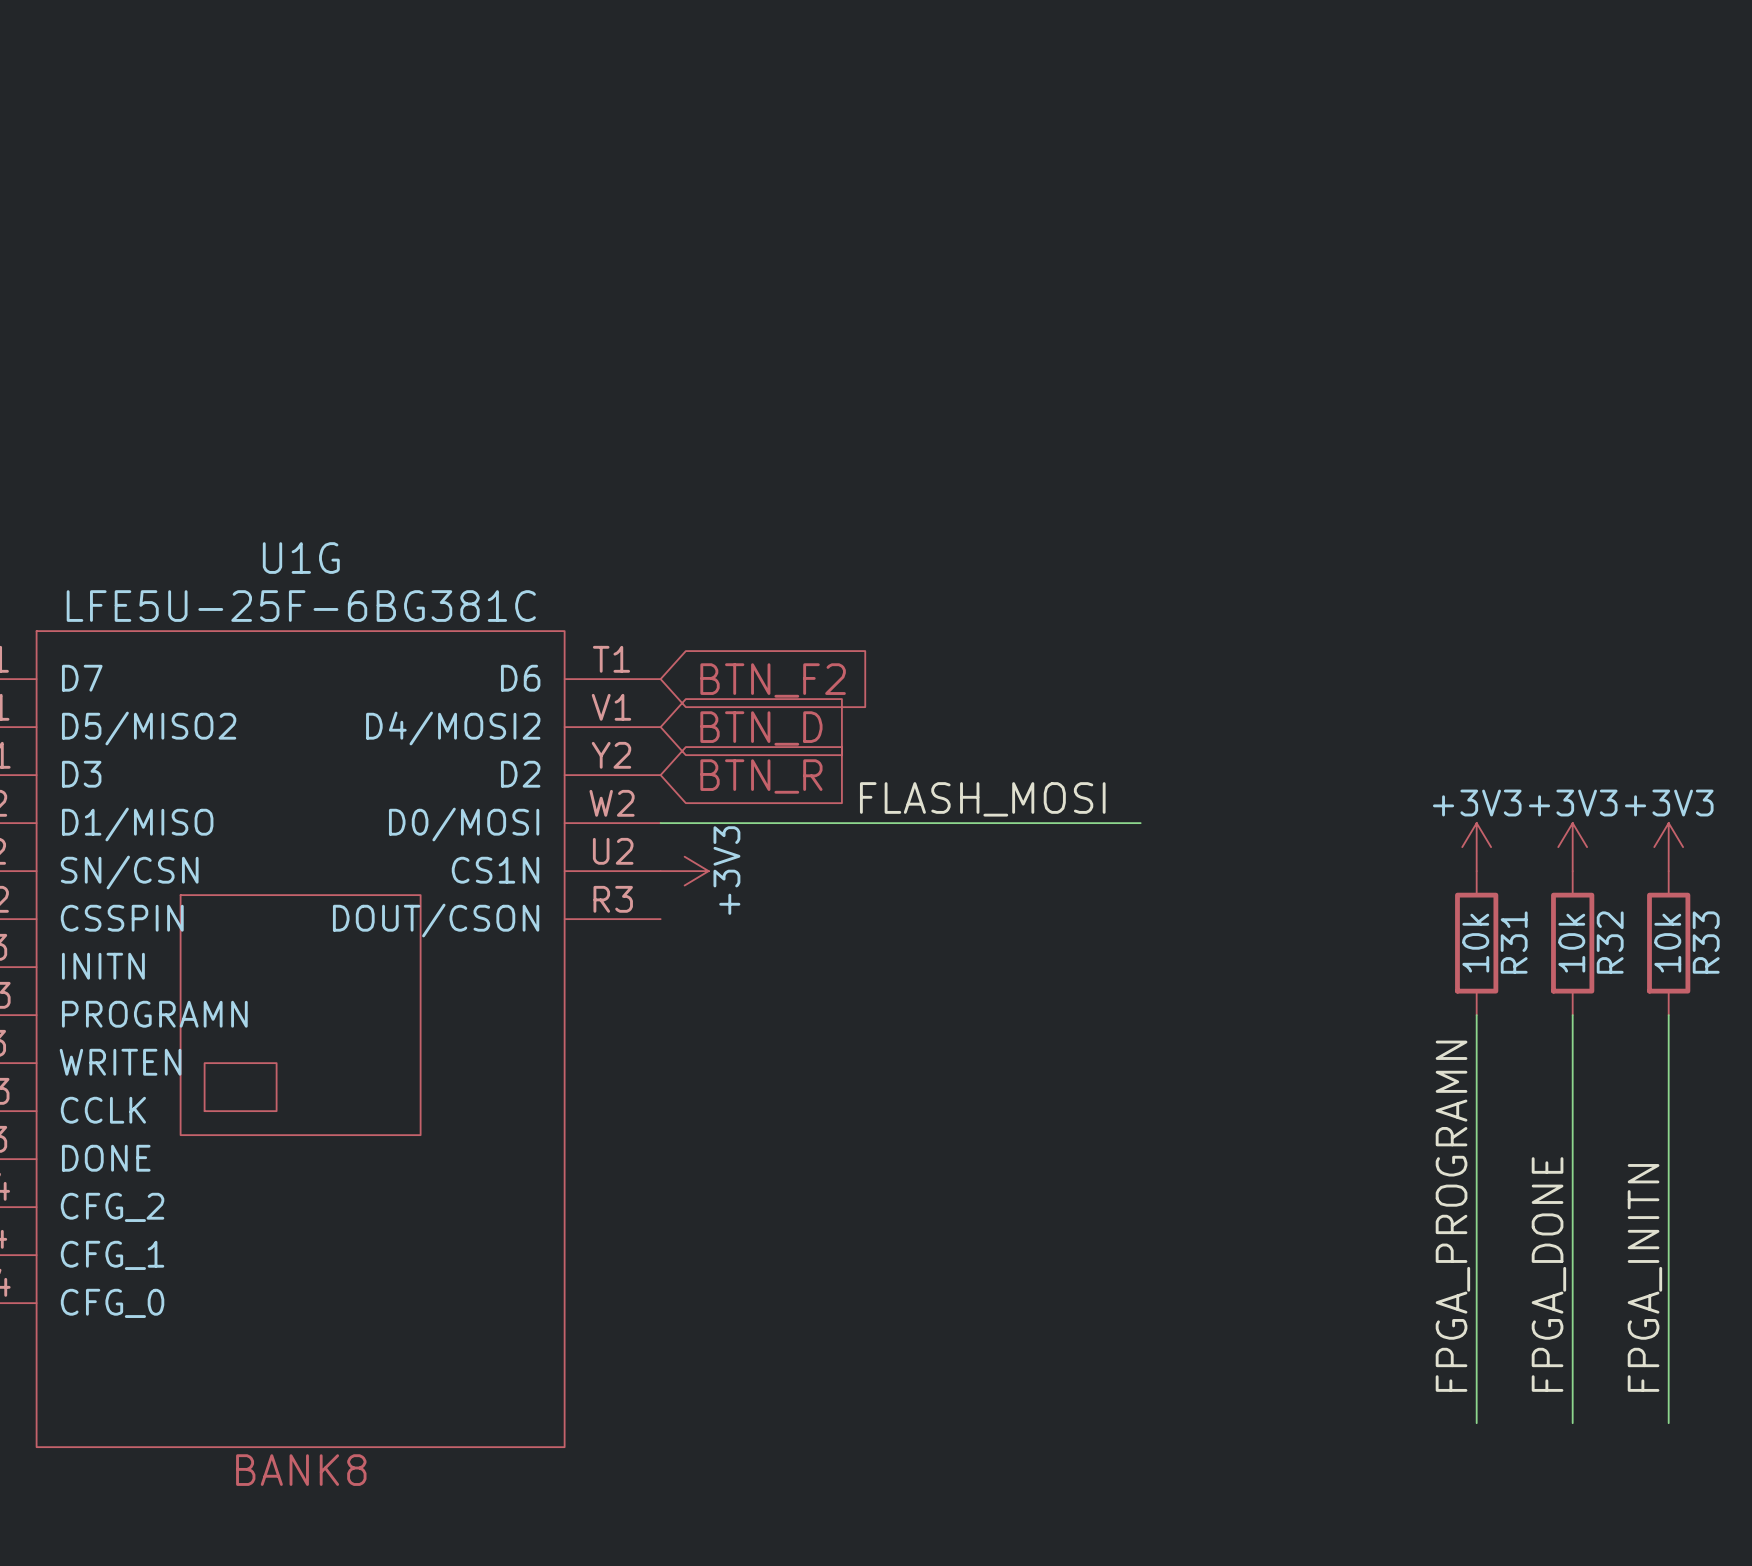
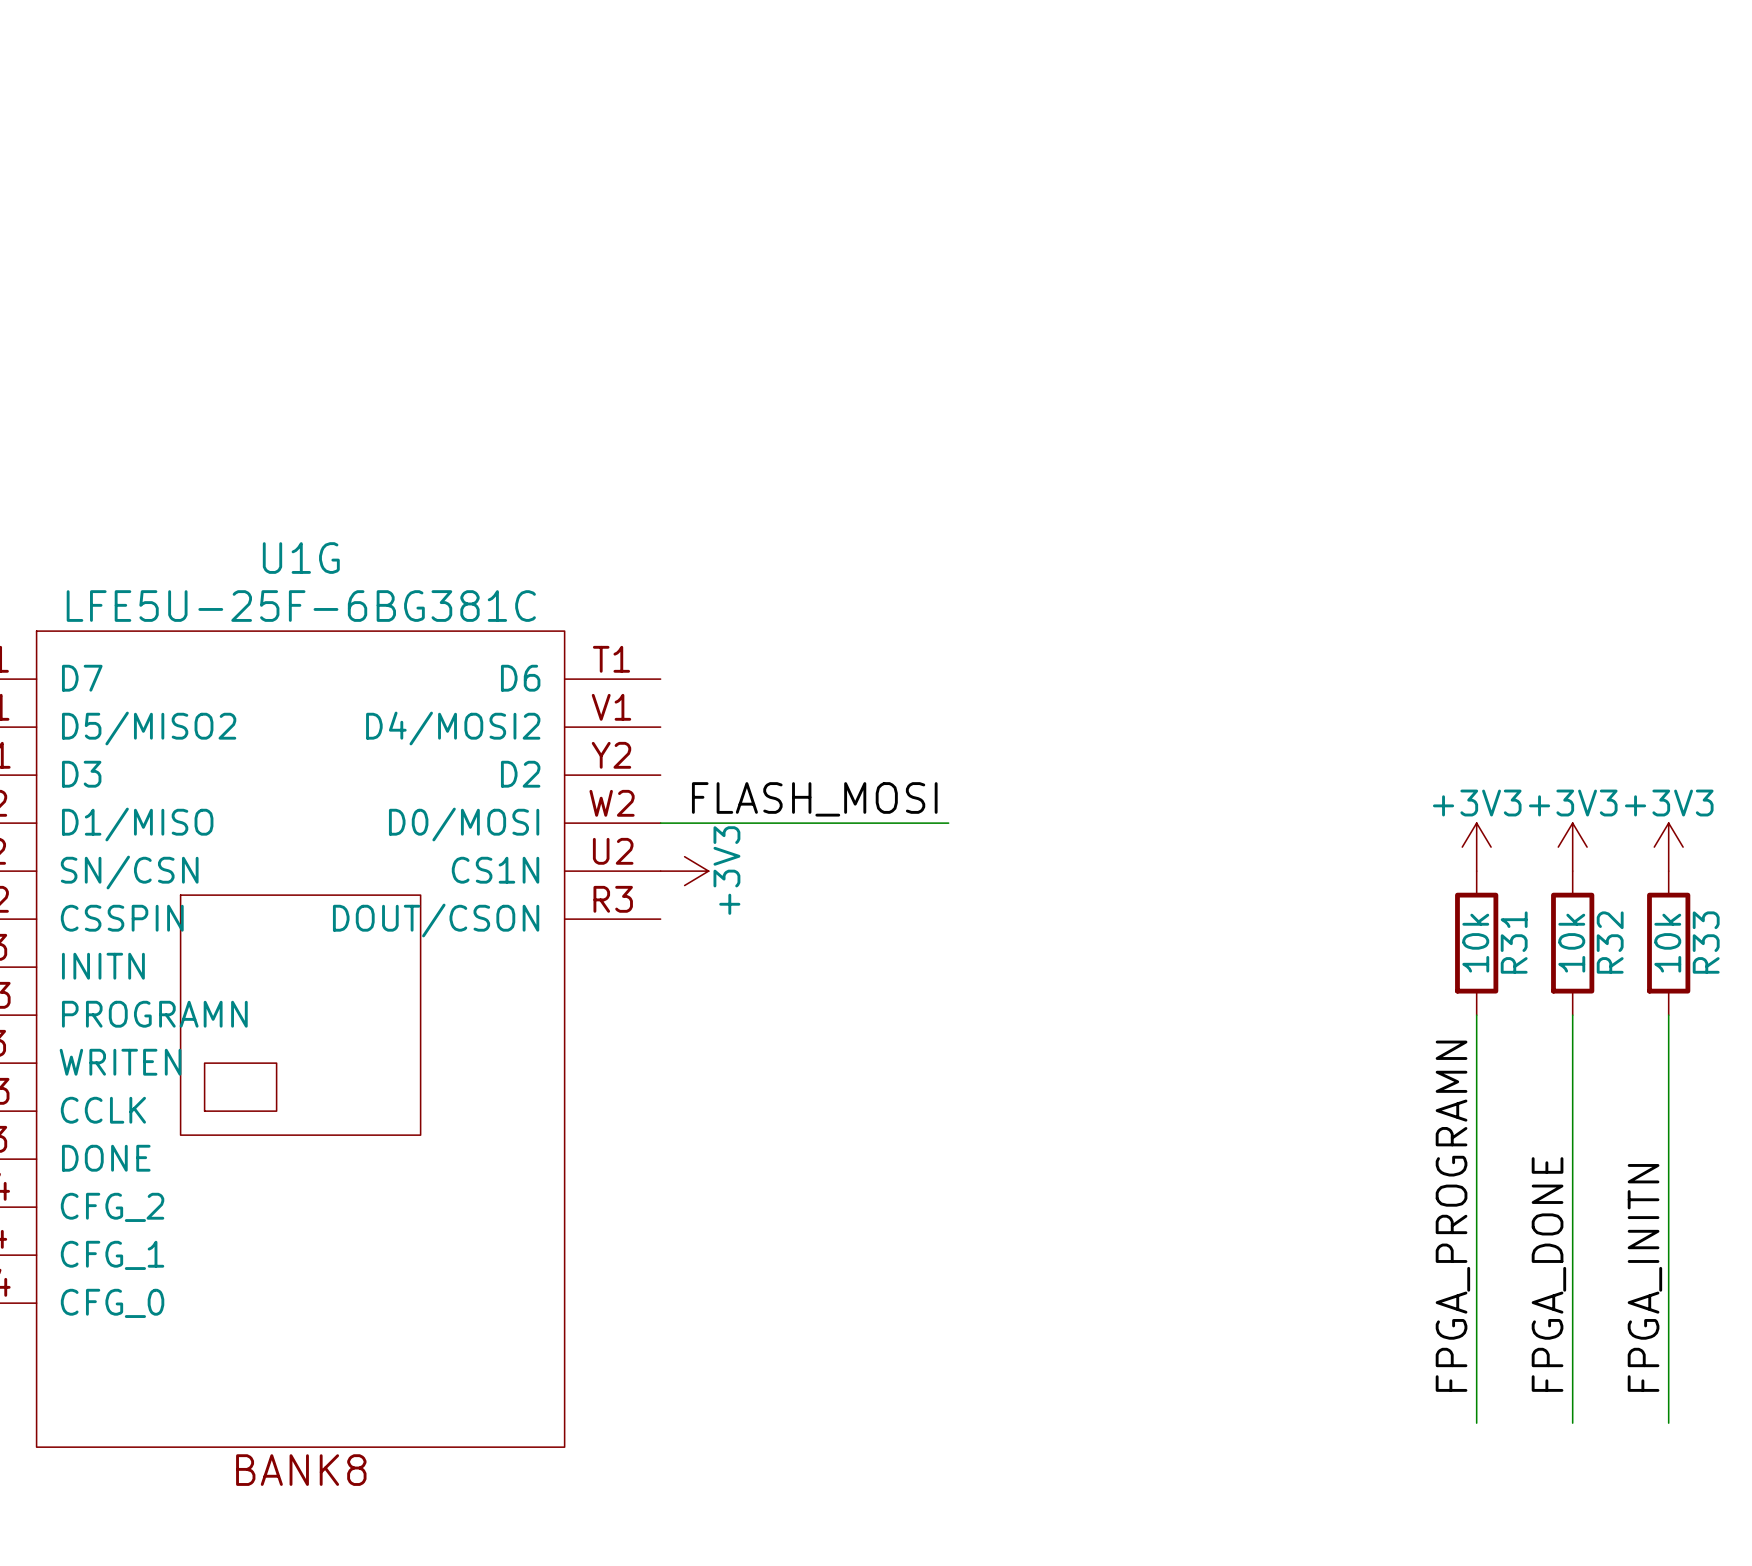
global label: BTN_F2 (773, 680) -> none
global label: BTN_D (761, 728) -> none
global label: BTN_R (761, 776) -> none
label position: FLASH_MOSI (982, 799) -> FLASH_MOSI (814, 799)
wire: (948, 823) (1140, 823) -> none

